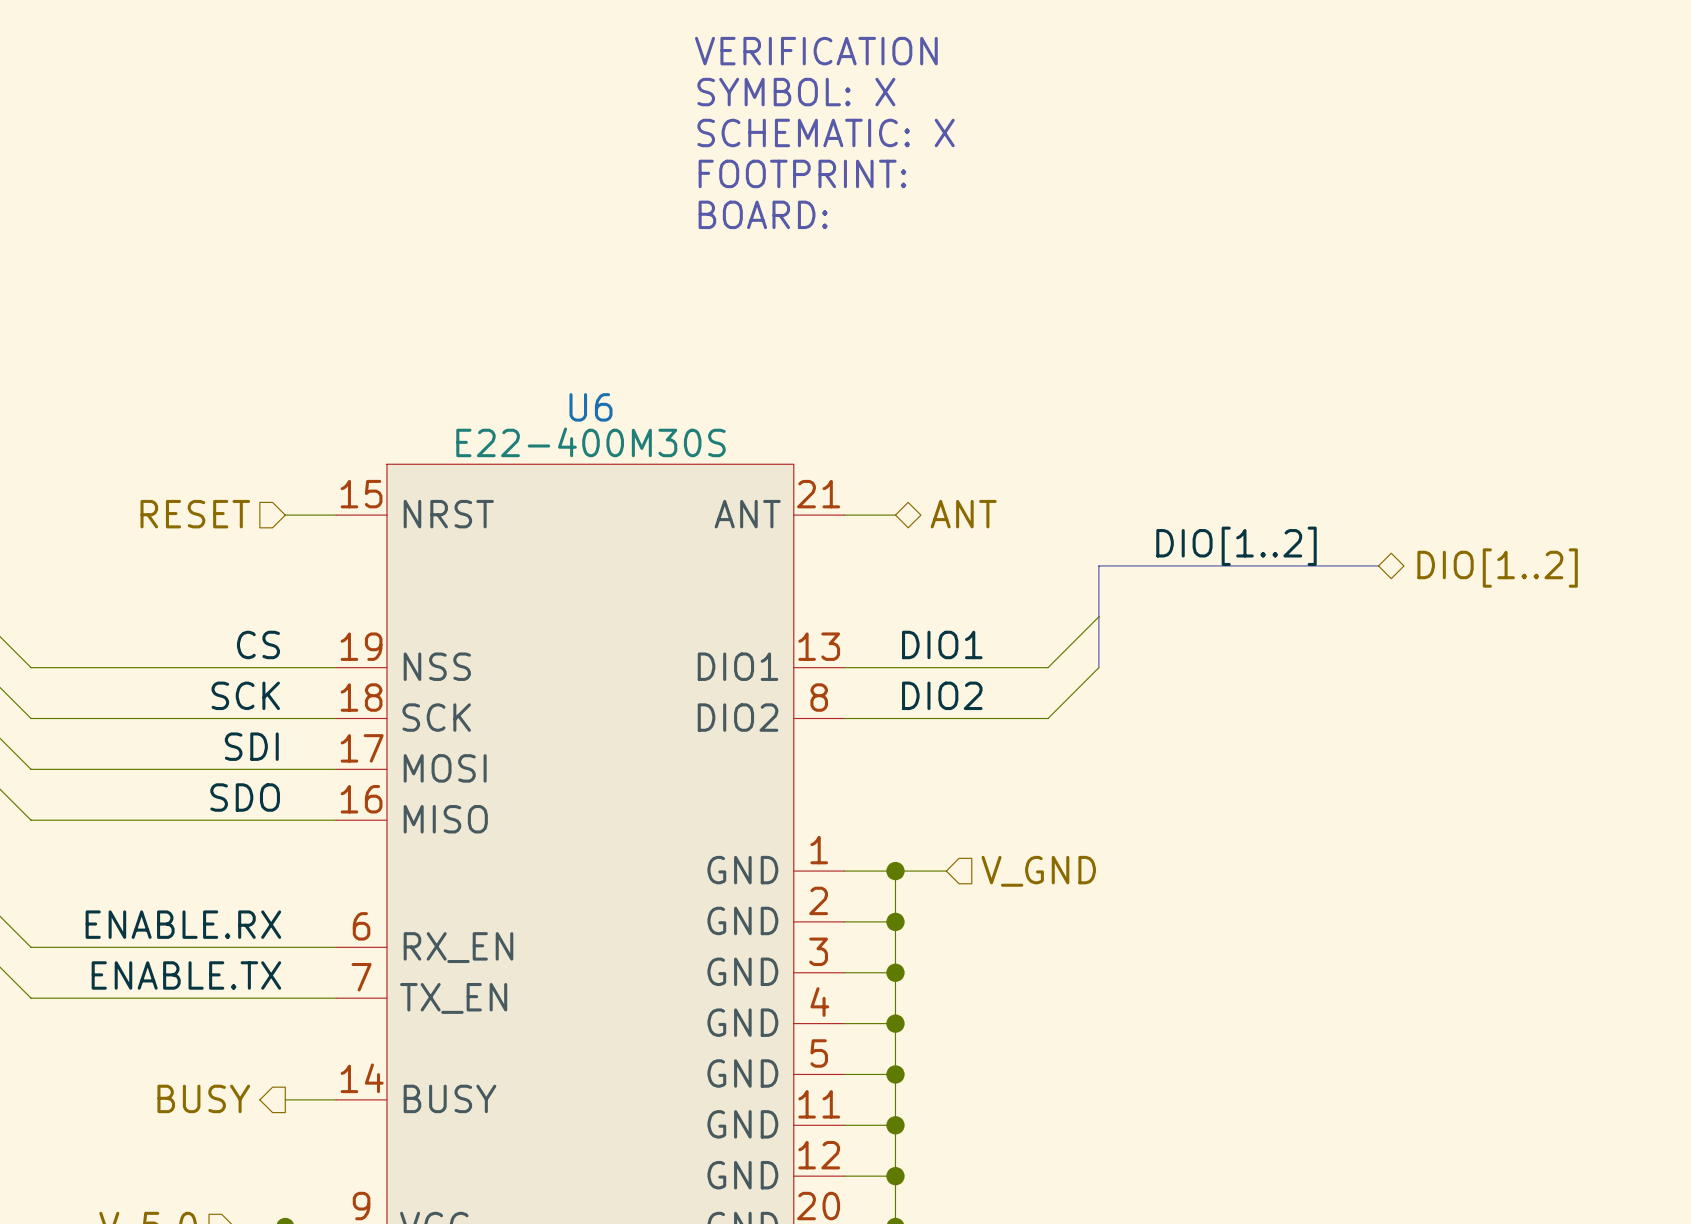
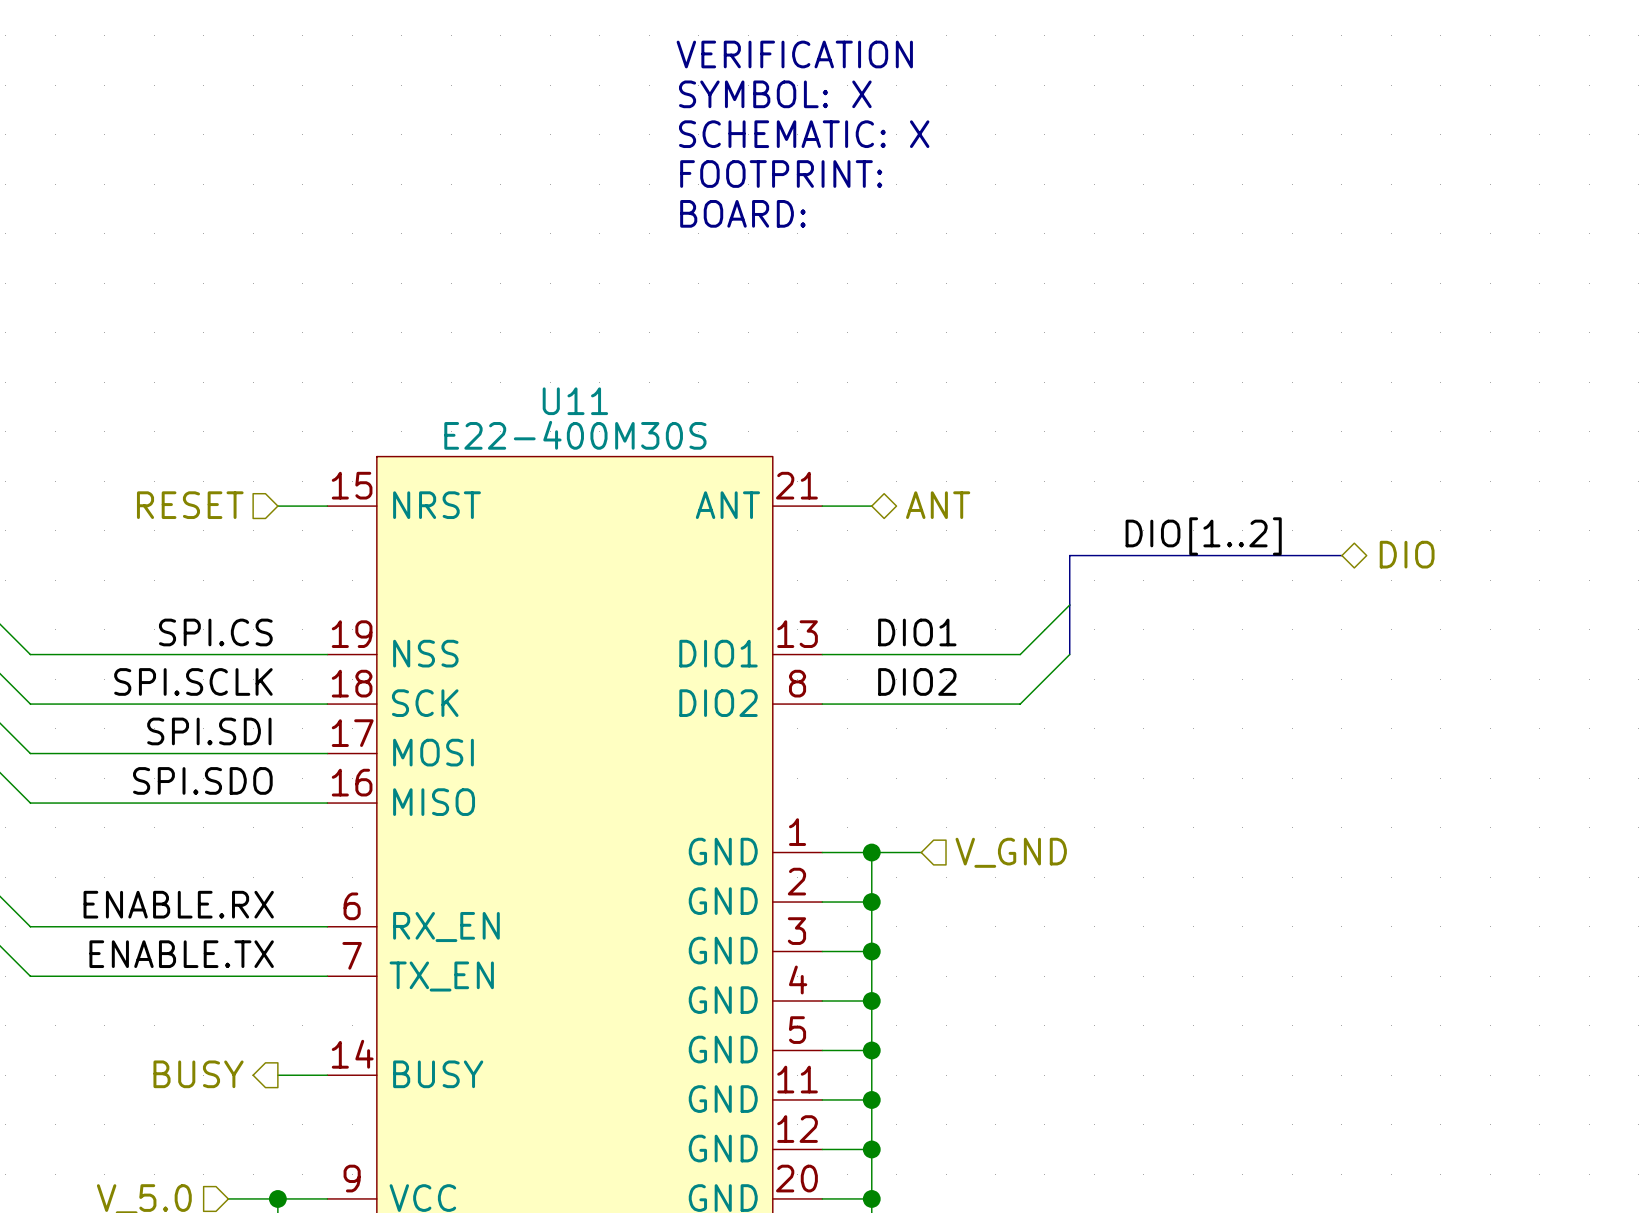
U6 name: U6 (590, 407) -> U11 (575, 401)
hierarchical label: DIO[1..2] (1497, 568) -> DIO (1407, 554)
label: CS (258, 644) -> SPI.CS (215, 632)
label: SCK (245, 695) -> SPI.SCLK (193, 681)
label: SDI (251, 746) -> SPI.SDI (209, 731)
label: SDO (245, 797) -> SPI.SDO (202, 780)

